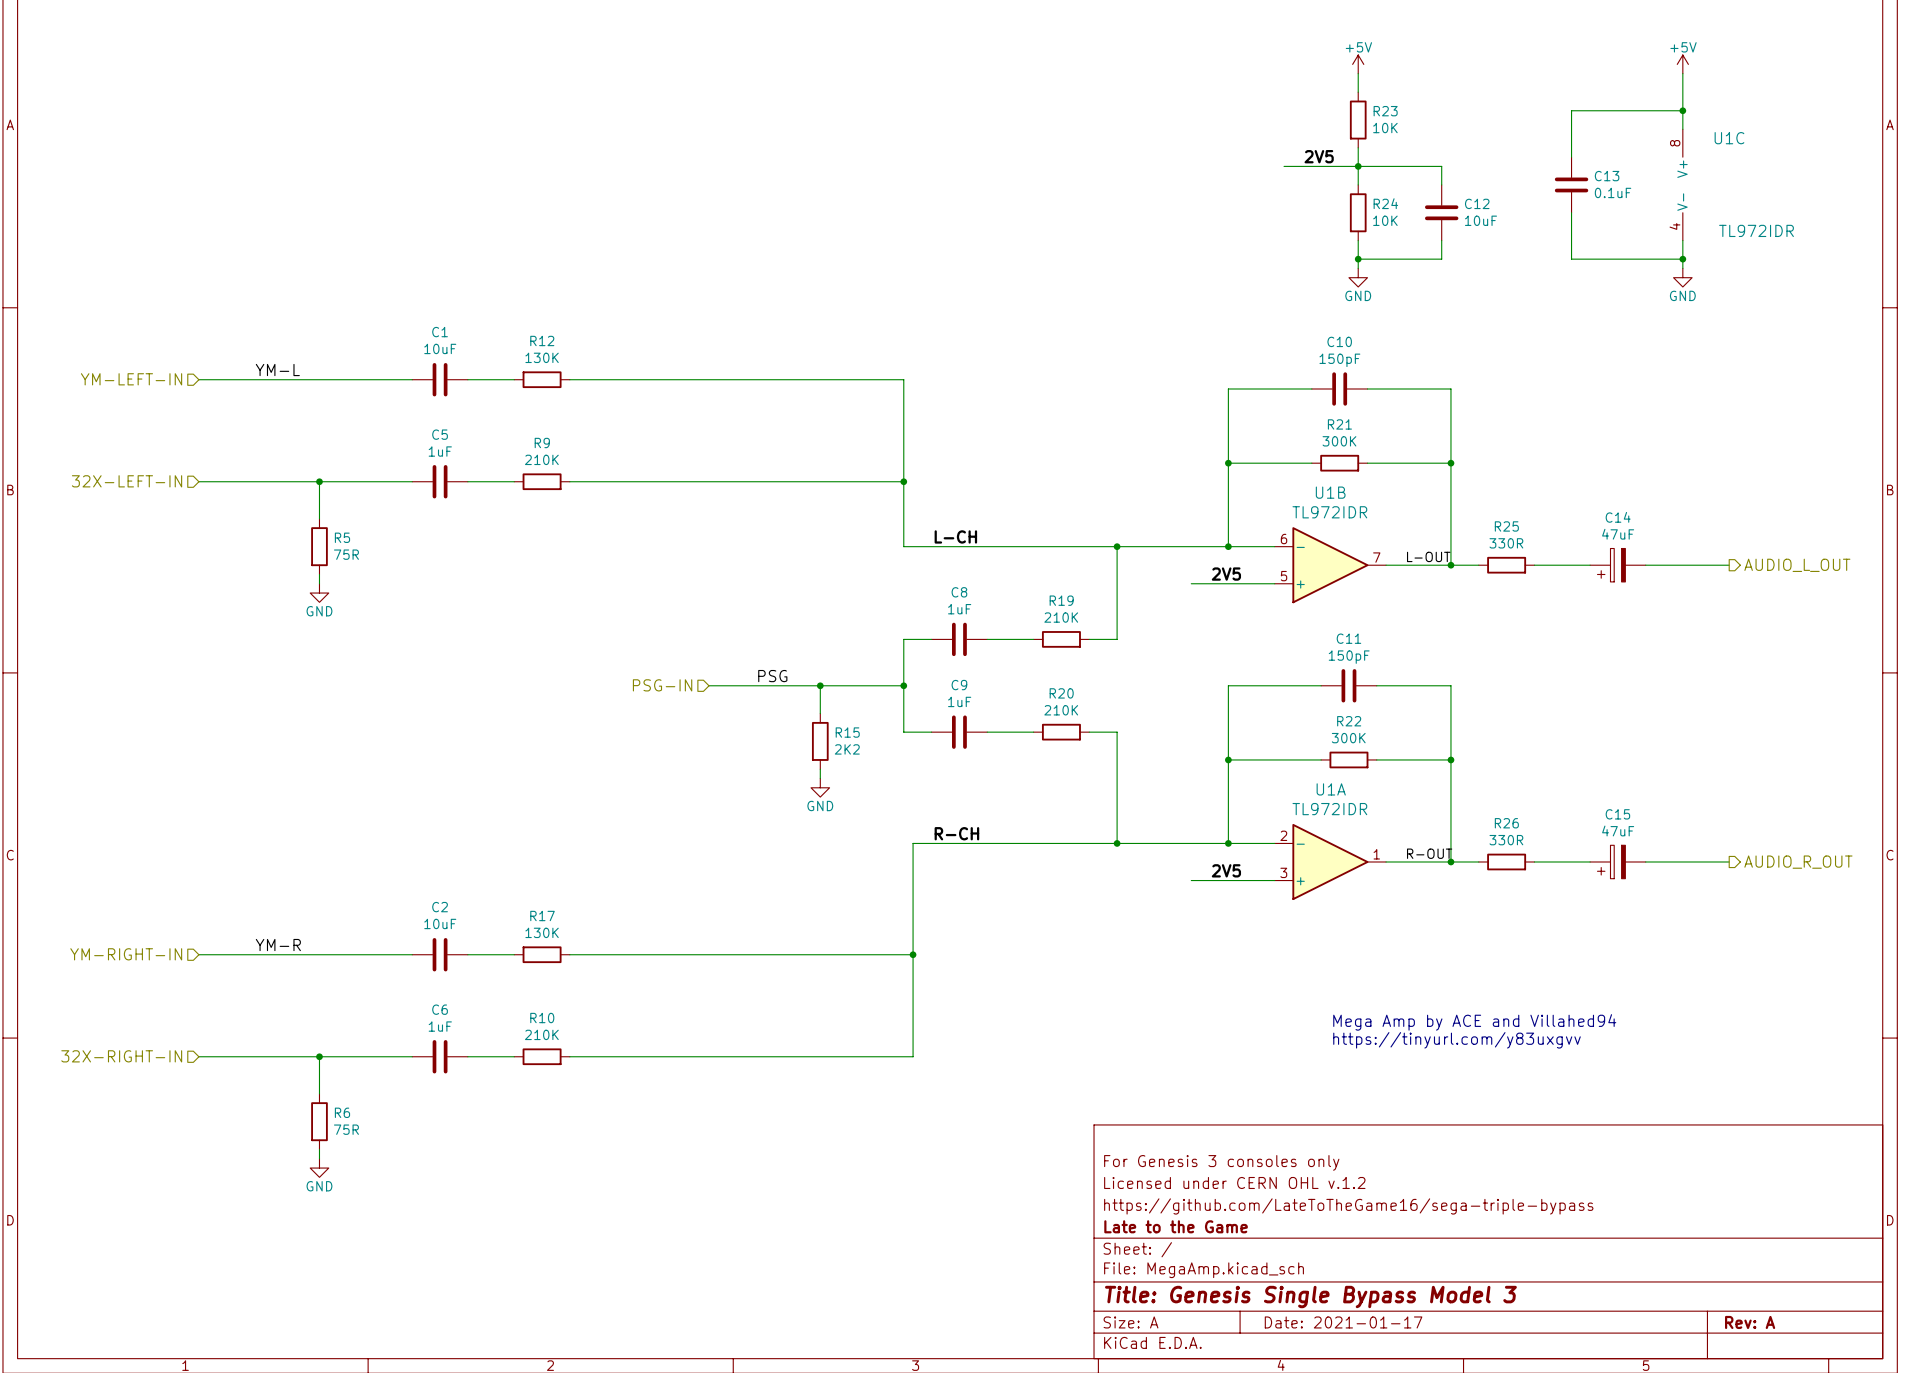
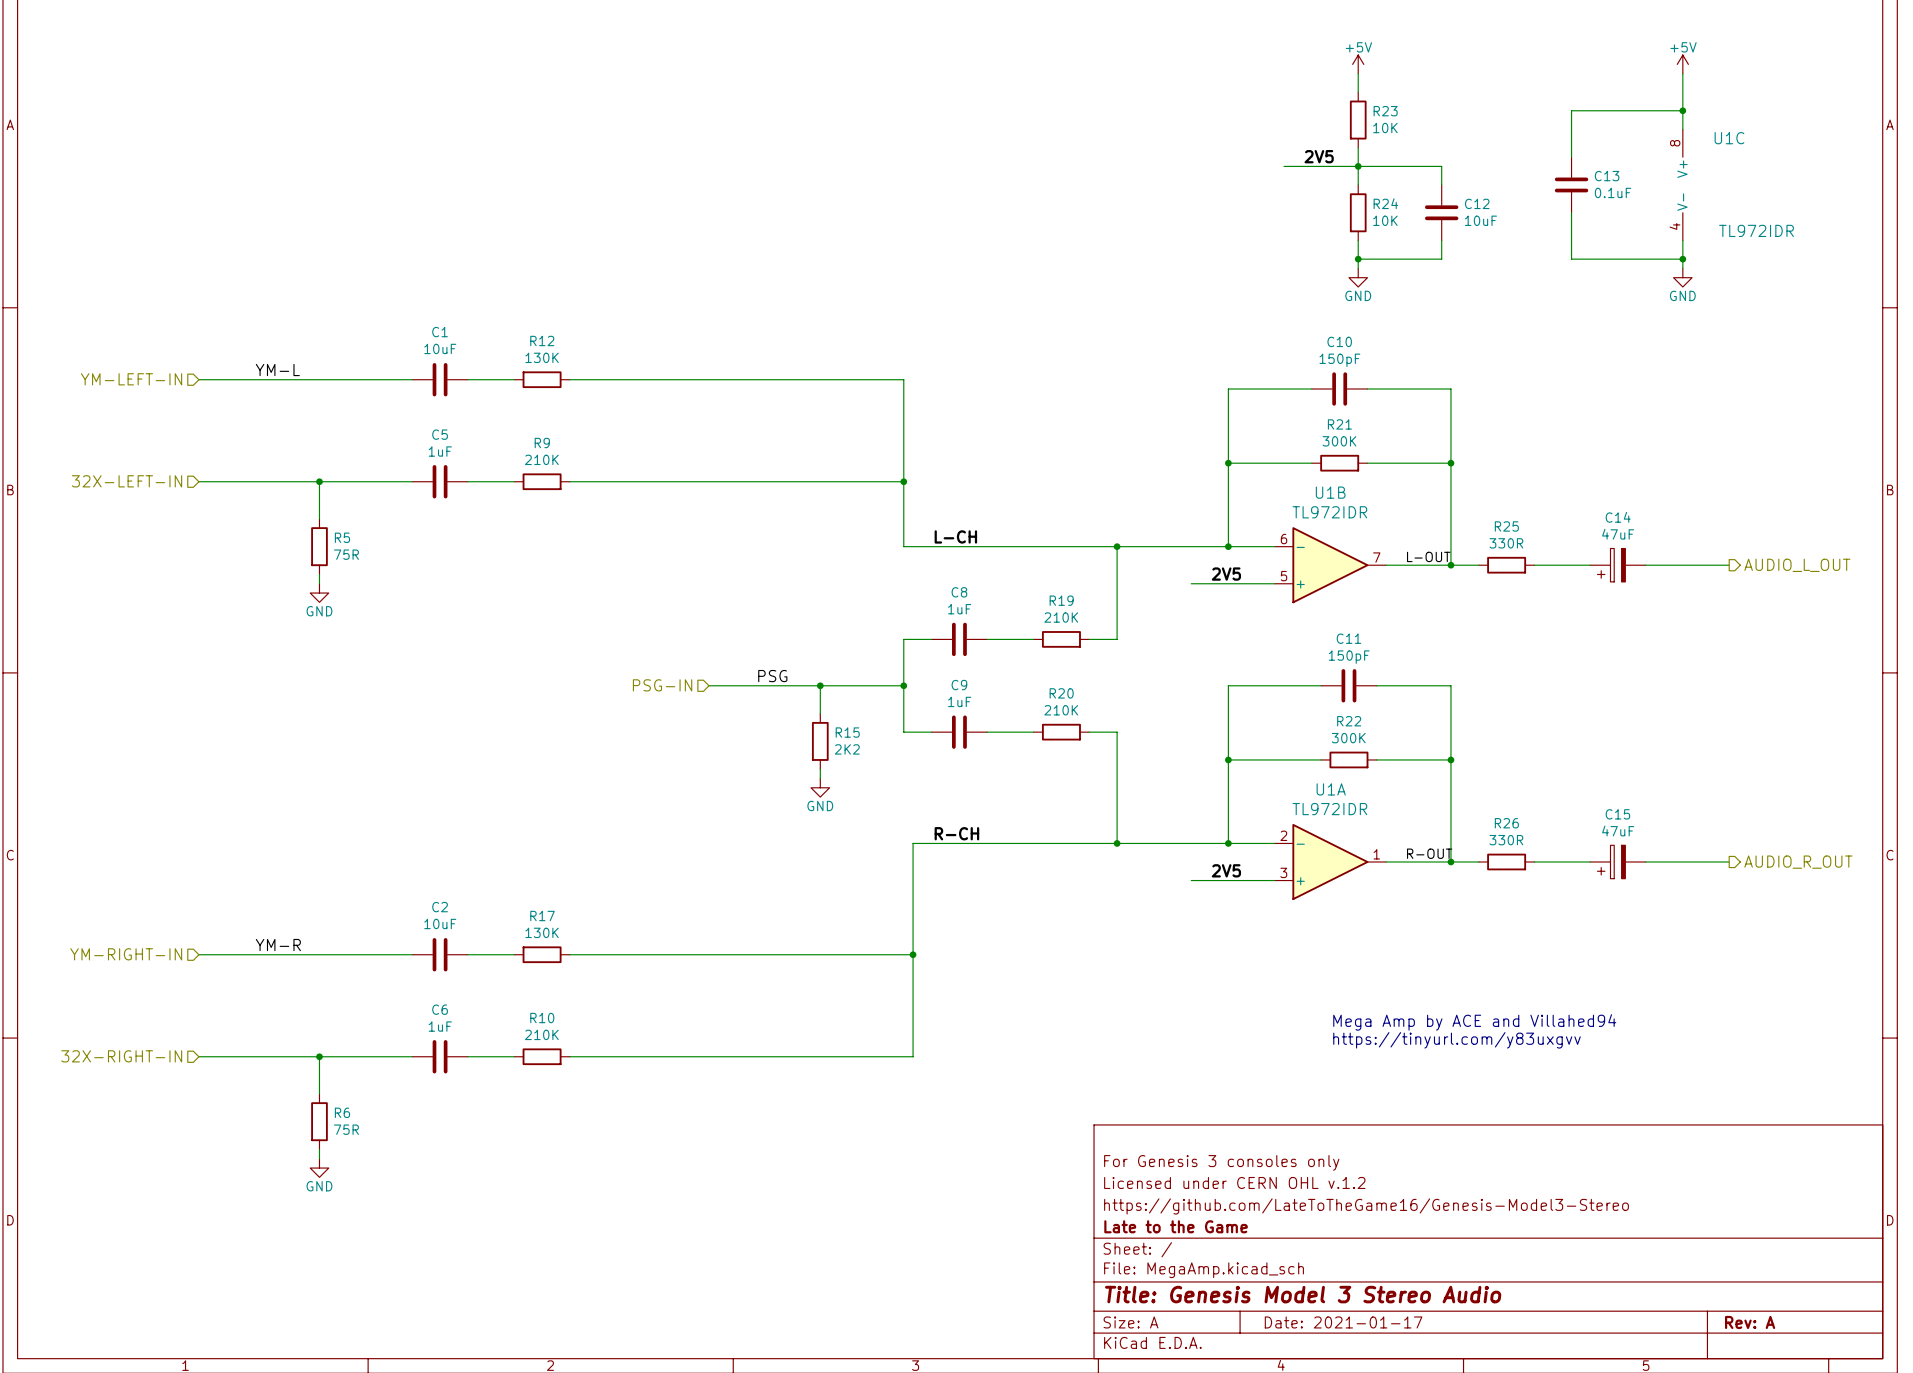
title block: https://github.com/LateToTheGame16/sega-triple-bypass (1348, 1206) -> https://github.com/LateToTheGame16/Genesis-Model3-Stereo (1366, 1206)
title block: Title: Genesis Single Bypass Model 3 (1310, 1297) -> Title: Genesis Model 3 Stereo Audio (1303, 1294)

